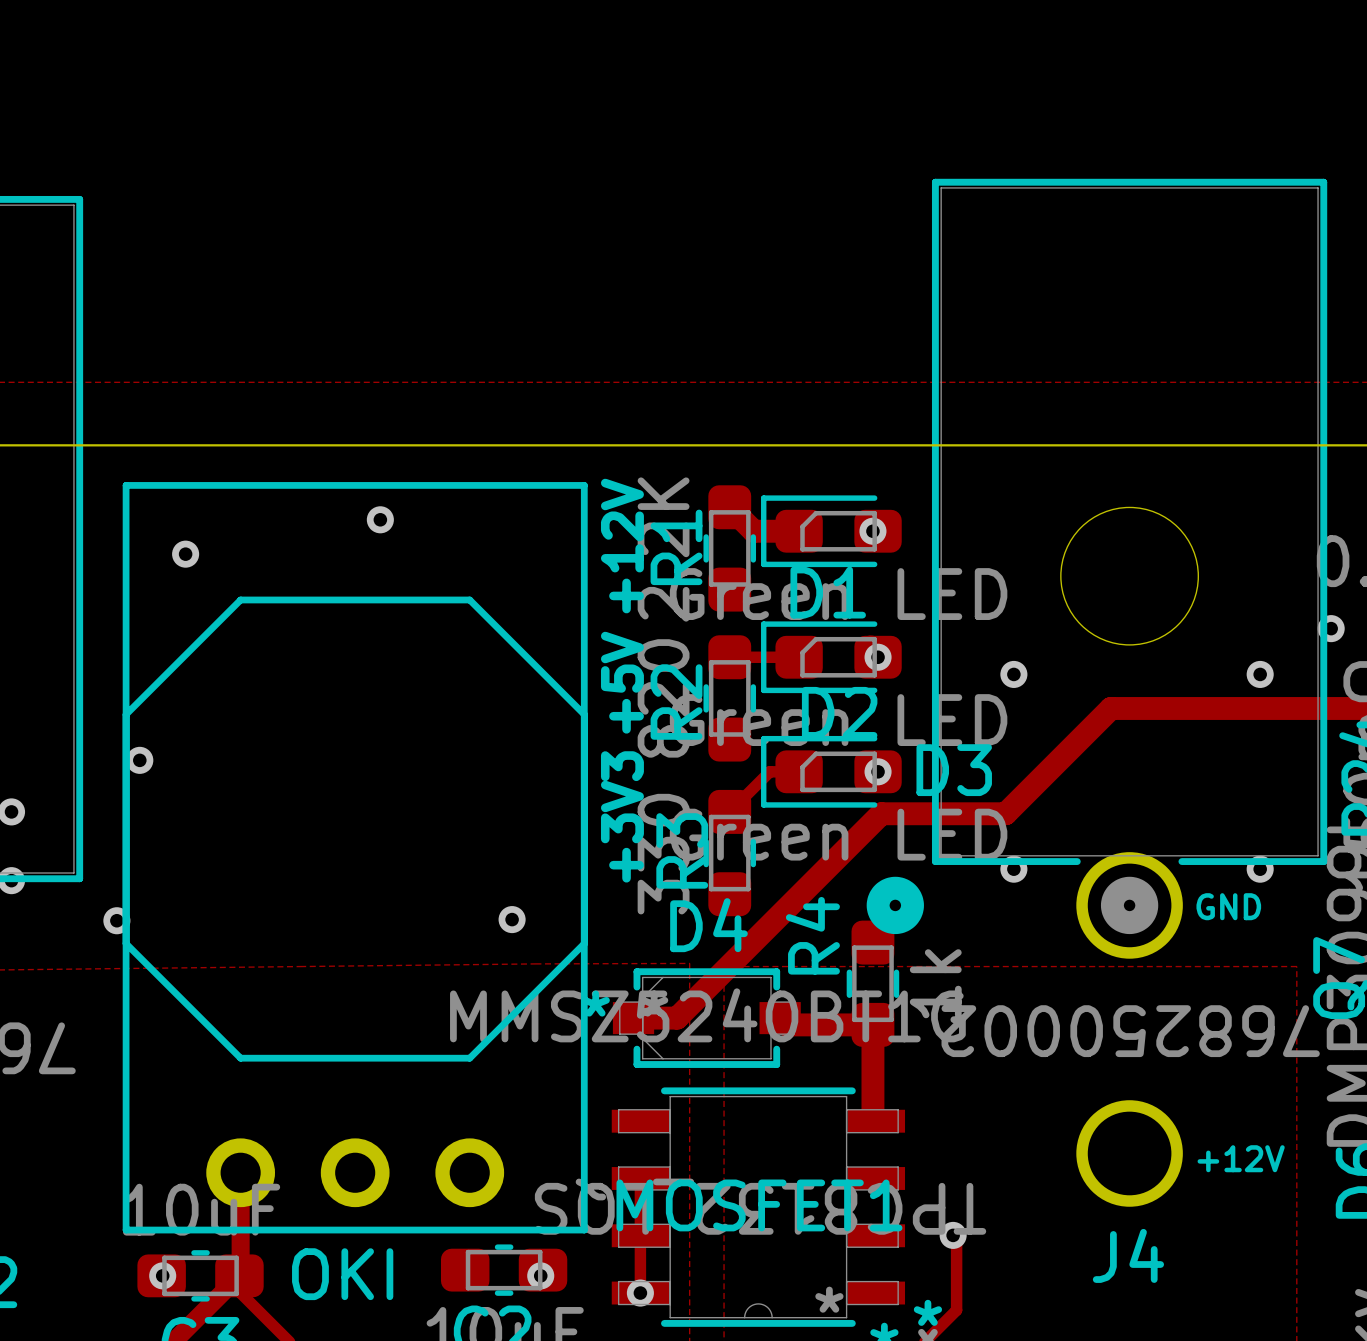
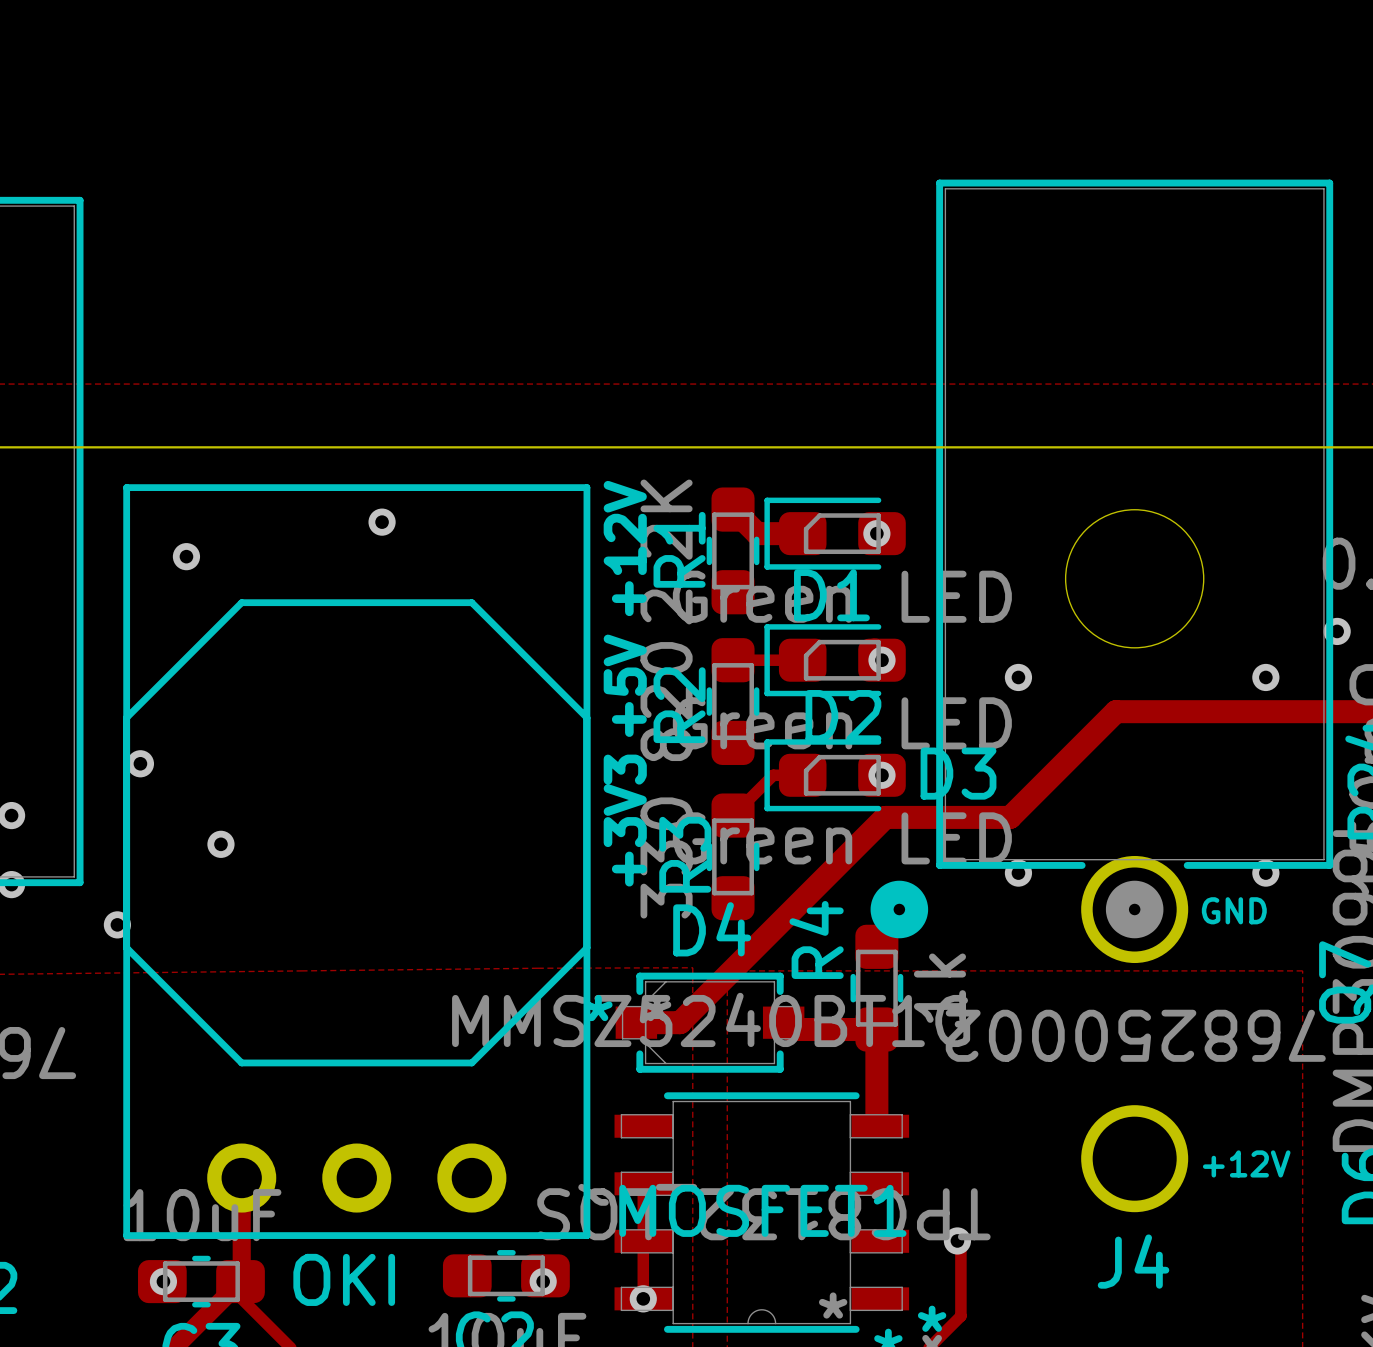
via: none -> (220, 844)
via: (512, 919) -> none

